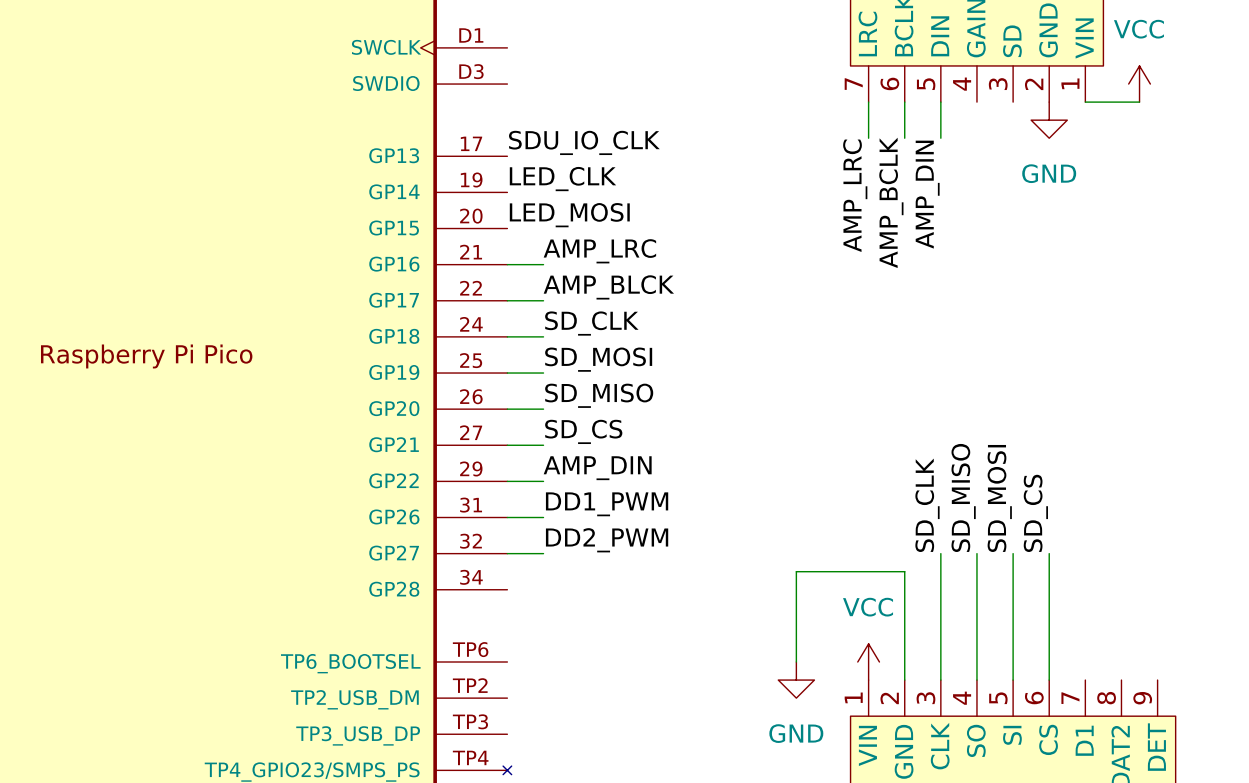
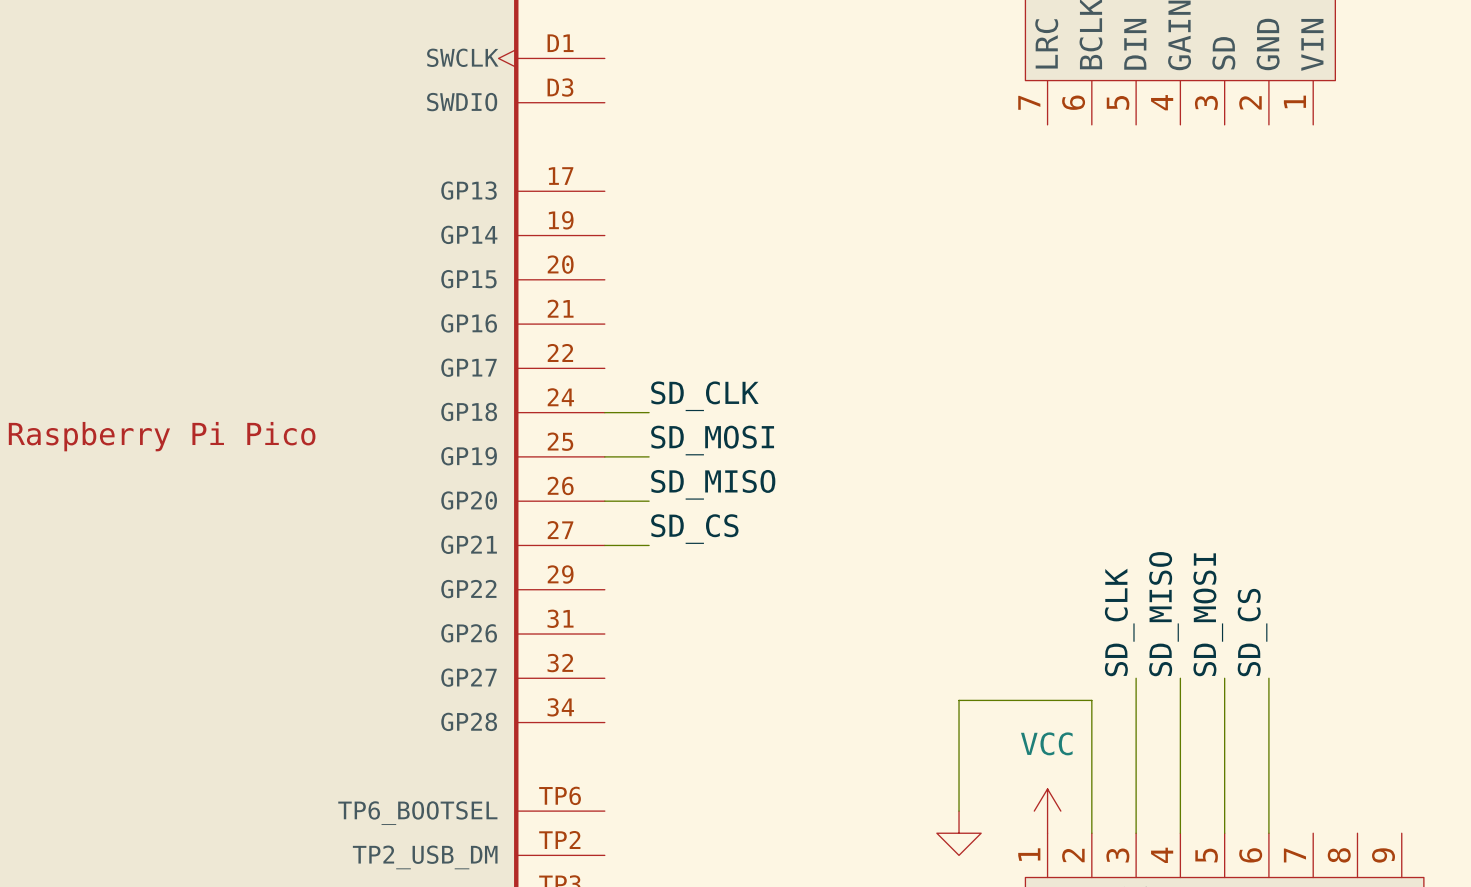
power symbol: VCC (1139, 84) -> none
wire: (868, 102) (868, 138) -> none
wire: (904, 102) (904, 138) -> none
wire: (940, 102) (940, 138) -> none
wire: (1085, 102) (1139, 102) -> none
power symbol: GND (1049, 120) -> none
label: SDU_IO_CLK (584, 142) -> none
label: LED_CLK (562, 179) -> none
label: AMP_DIN (927, 194) -> none
label: AMP_LRC (855, 195) -> none
label: AMP_BCLK (891, 202) -> none
label: LED_MOSI (569, 215) -> none
label: AMP_LRC (599, 251) -> none
wire: (507, 264) (543, 264) -> none
label: AMP_BLCK (608, 287) -> none
wire: (507, 300) (543, 300) -> none
label: AMP_DIN (597, 468) -> none
wire: (507, 481) (543, 481) -> none
label: DD1_PWM (607, 504) -> none
wire: (507, 517) (543, 517) -> none
label: DD2_PWM (607, 540) -> none
wire: (507, 553) (543, 553) -> none

